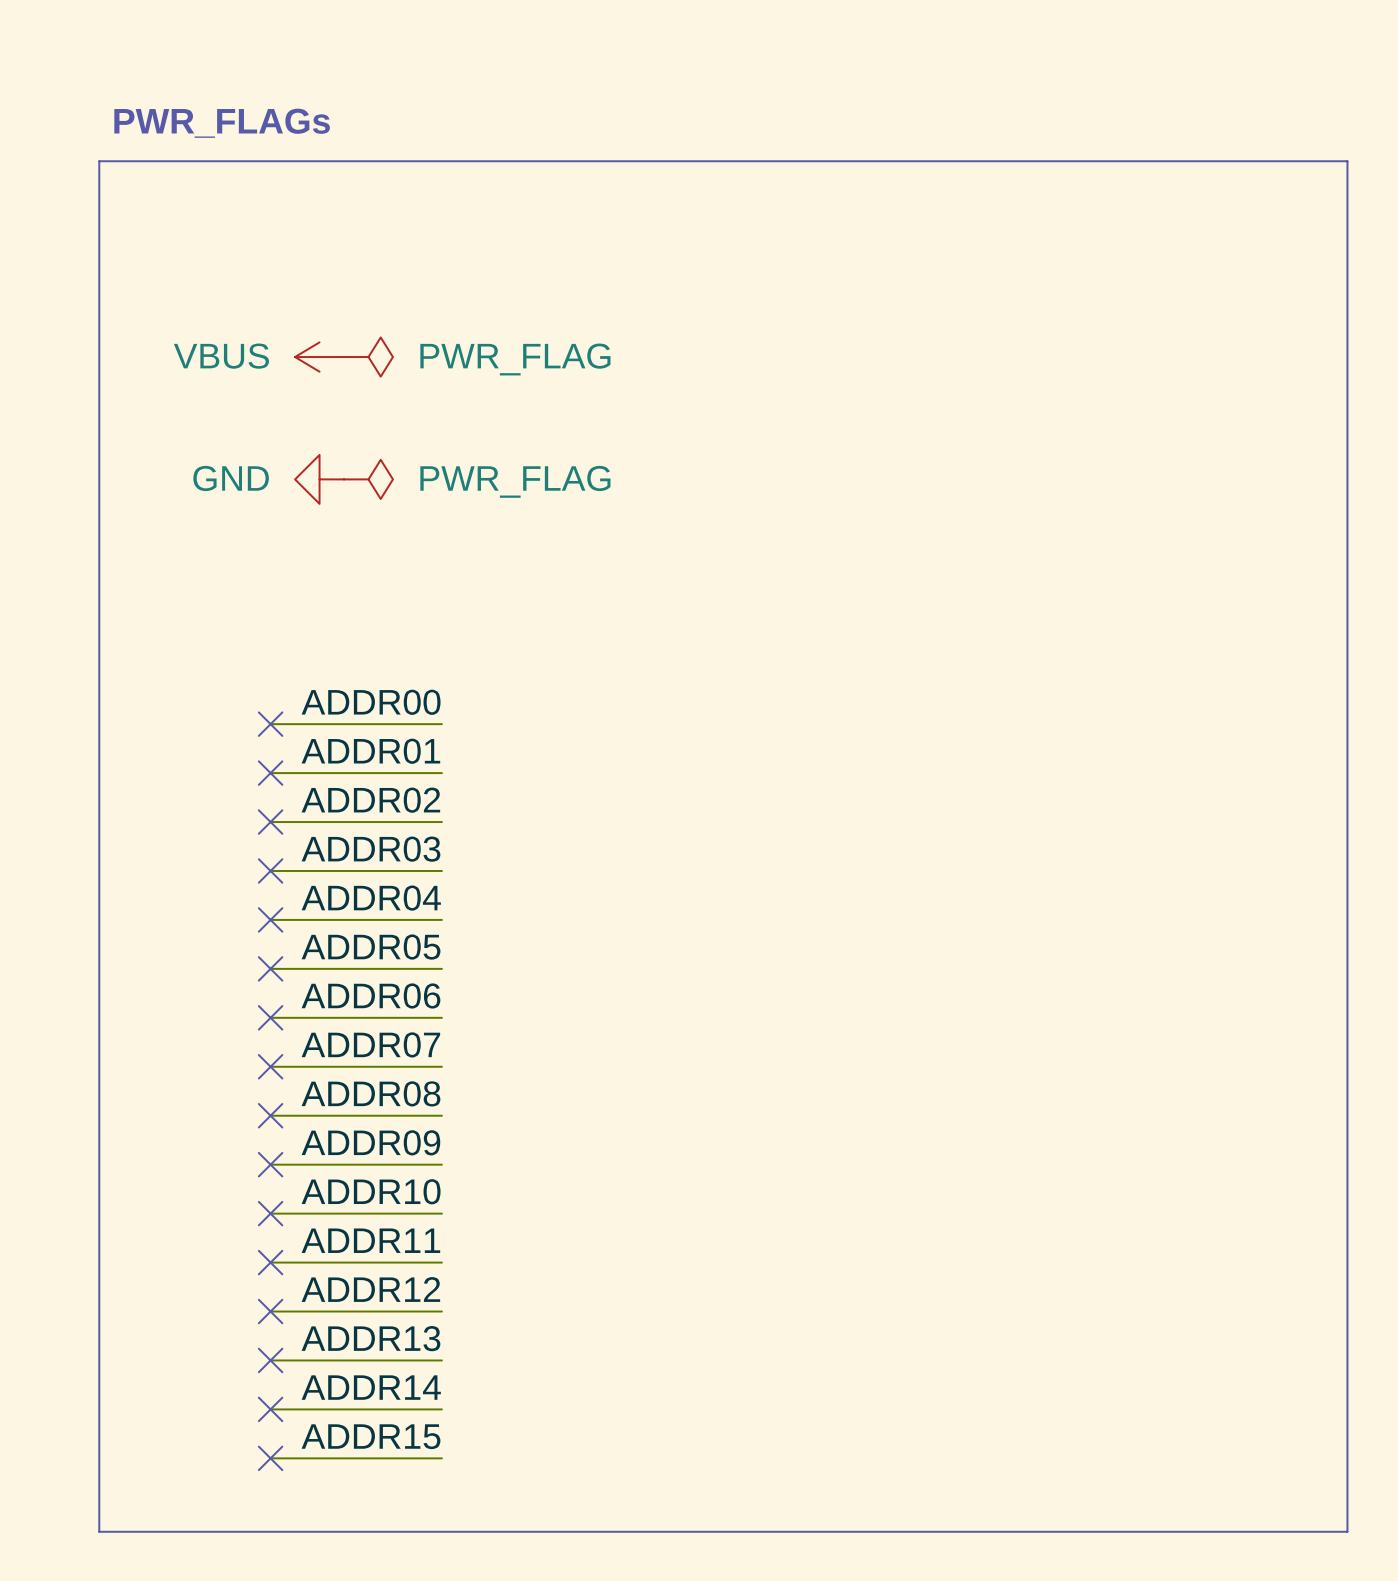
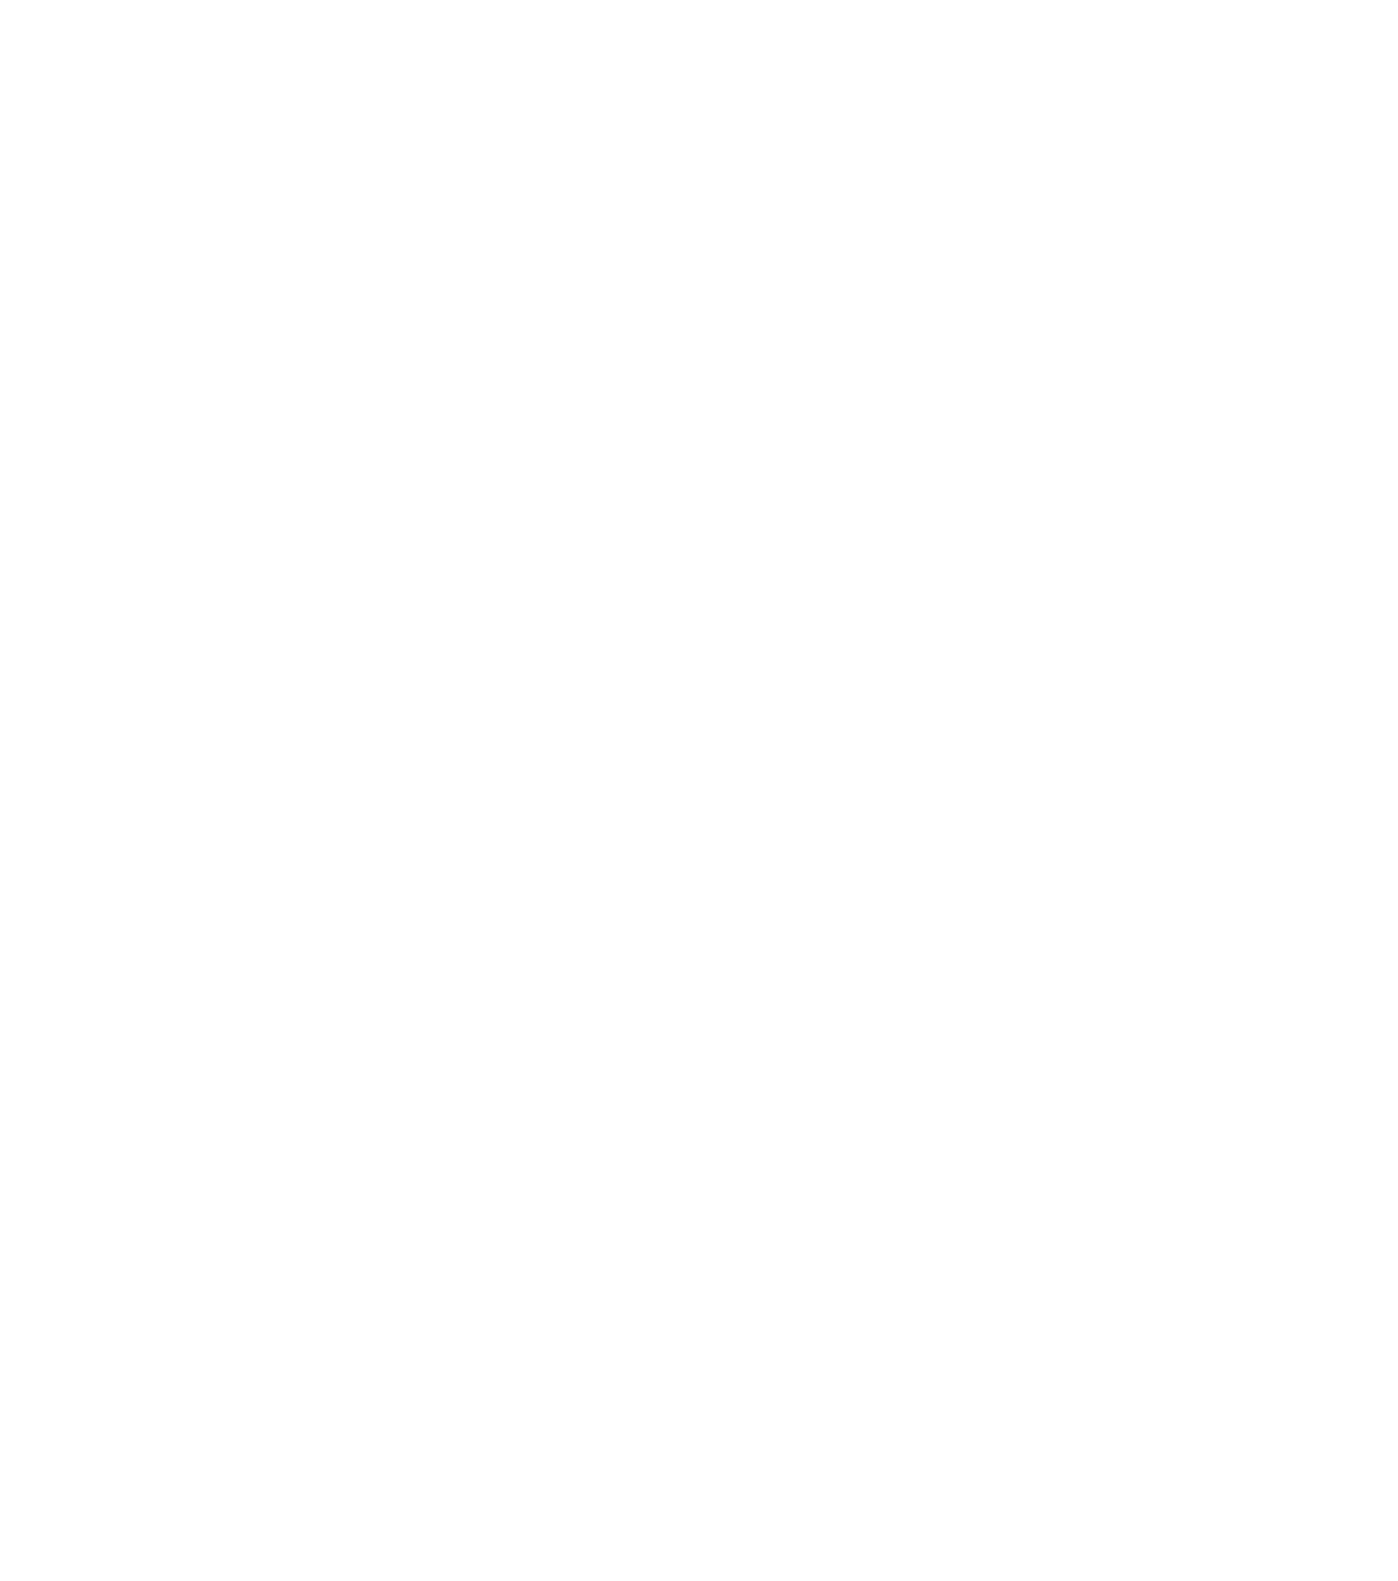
text: PWR_FLAGs (222, 123) -> none
line: (99, 161) (1347, 161) (1347, 1531) (99, 1531) (99, 161) -> none
power symbol: VBUS (319, 357) -> none
power symbol: PWR_FLAG (368, 357) -> none
power symbol: GND (319, 479) -> none
power symbol: PWR_FLAG (368, 479) -> none
label: ADDR00 (371, 702) -> none
wire: (270, 724) (441, 724) -> none
no-connect mark: (270, 724) -> none
label: ADDR01 (370, 751) -> none
wire: (270, 773) (441, 773) -> none
no-connect mark: (270, 773) -> none
label: ADDR02 (370, 800) -> none
wire: (270, 822) (441, 822) -> none
no-connect mark: (270, 822) -> none
label: ADDR03 (370, 849) -> none
wire: (270, 870) (441, 870) -> none
no-connect mark: (270, 870) -> none
label: ADDR04 (371, 898) -> none
wire: (270, 919) (441, 919) -> none
no-connect mark: (270, 919) -> none
label: ADDR05 (371, 947) -> none
wire: (270, 968) (441, 968) -> none
no-connect mark: (270, 968) -> none
label: ADDR06 (370, 995) -> none
wire: (270, 1017) (441, 1017) -> none
no-connect mark: (270, 1017) -> none
label: ADDR07 (370, 1044) -> none
wire: (270, 1066) (441, 1066) -> none
no-connect mark: (270, 1066) -> none
label: ADDR08 (370, 1093) -> none
wire: (270, 1115) (441, 1115) -> none
no-connect mark: (270, 1115) -> none
label: ADDR09 (370, 1142) -> none
wire: (270, 1164) (441, 1164) -> none
no-connect mark: (270, 1164) -> none
label: ADDR10 (371, 1191) -> none
wire: (270, 1213) (441, 1213) -> none
no-connect mark: (270, 1213) -> none
label: ADDR11 (370, 1240) -> none
wire: (270, 1262) (441, 1262) -> none
no-connect mark: (270, 1262) -> none
label: ADDR12 (370, 1289) -> none
wire: (270, 1311) (441, 1311) -> none
no-connect mark: (270, 1311) -> none
label: ADDR13 (370, 1338) -> none
wire: (270, 1360) (441, 1360) -> none
no-connect mark: (270, 1360) -> none
label: ADDR14 (371, 1387) -> none
wire: (270, 1409) (441, 1409) -> none
no-connect mark: (270, 1409) -> none
label: ADDR15 (371, 1436) -> none
wire: (270, 1458) (441, 1458) -> none
no-connect mark: (270, 1458) -> none

